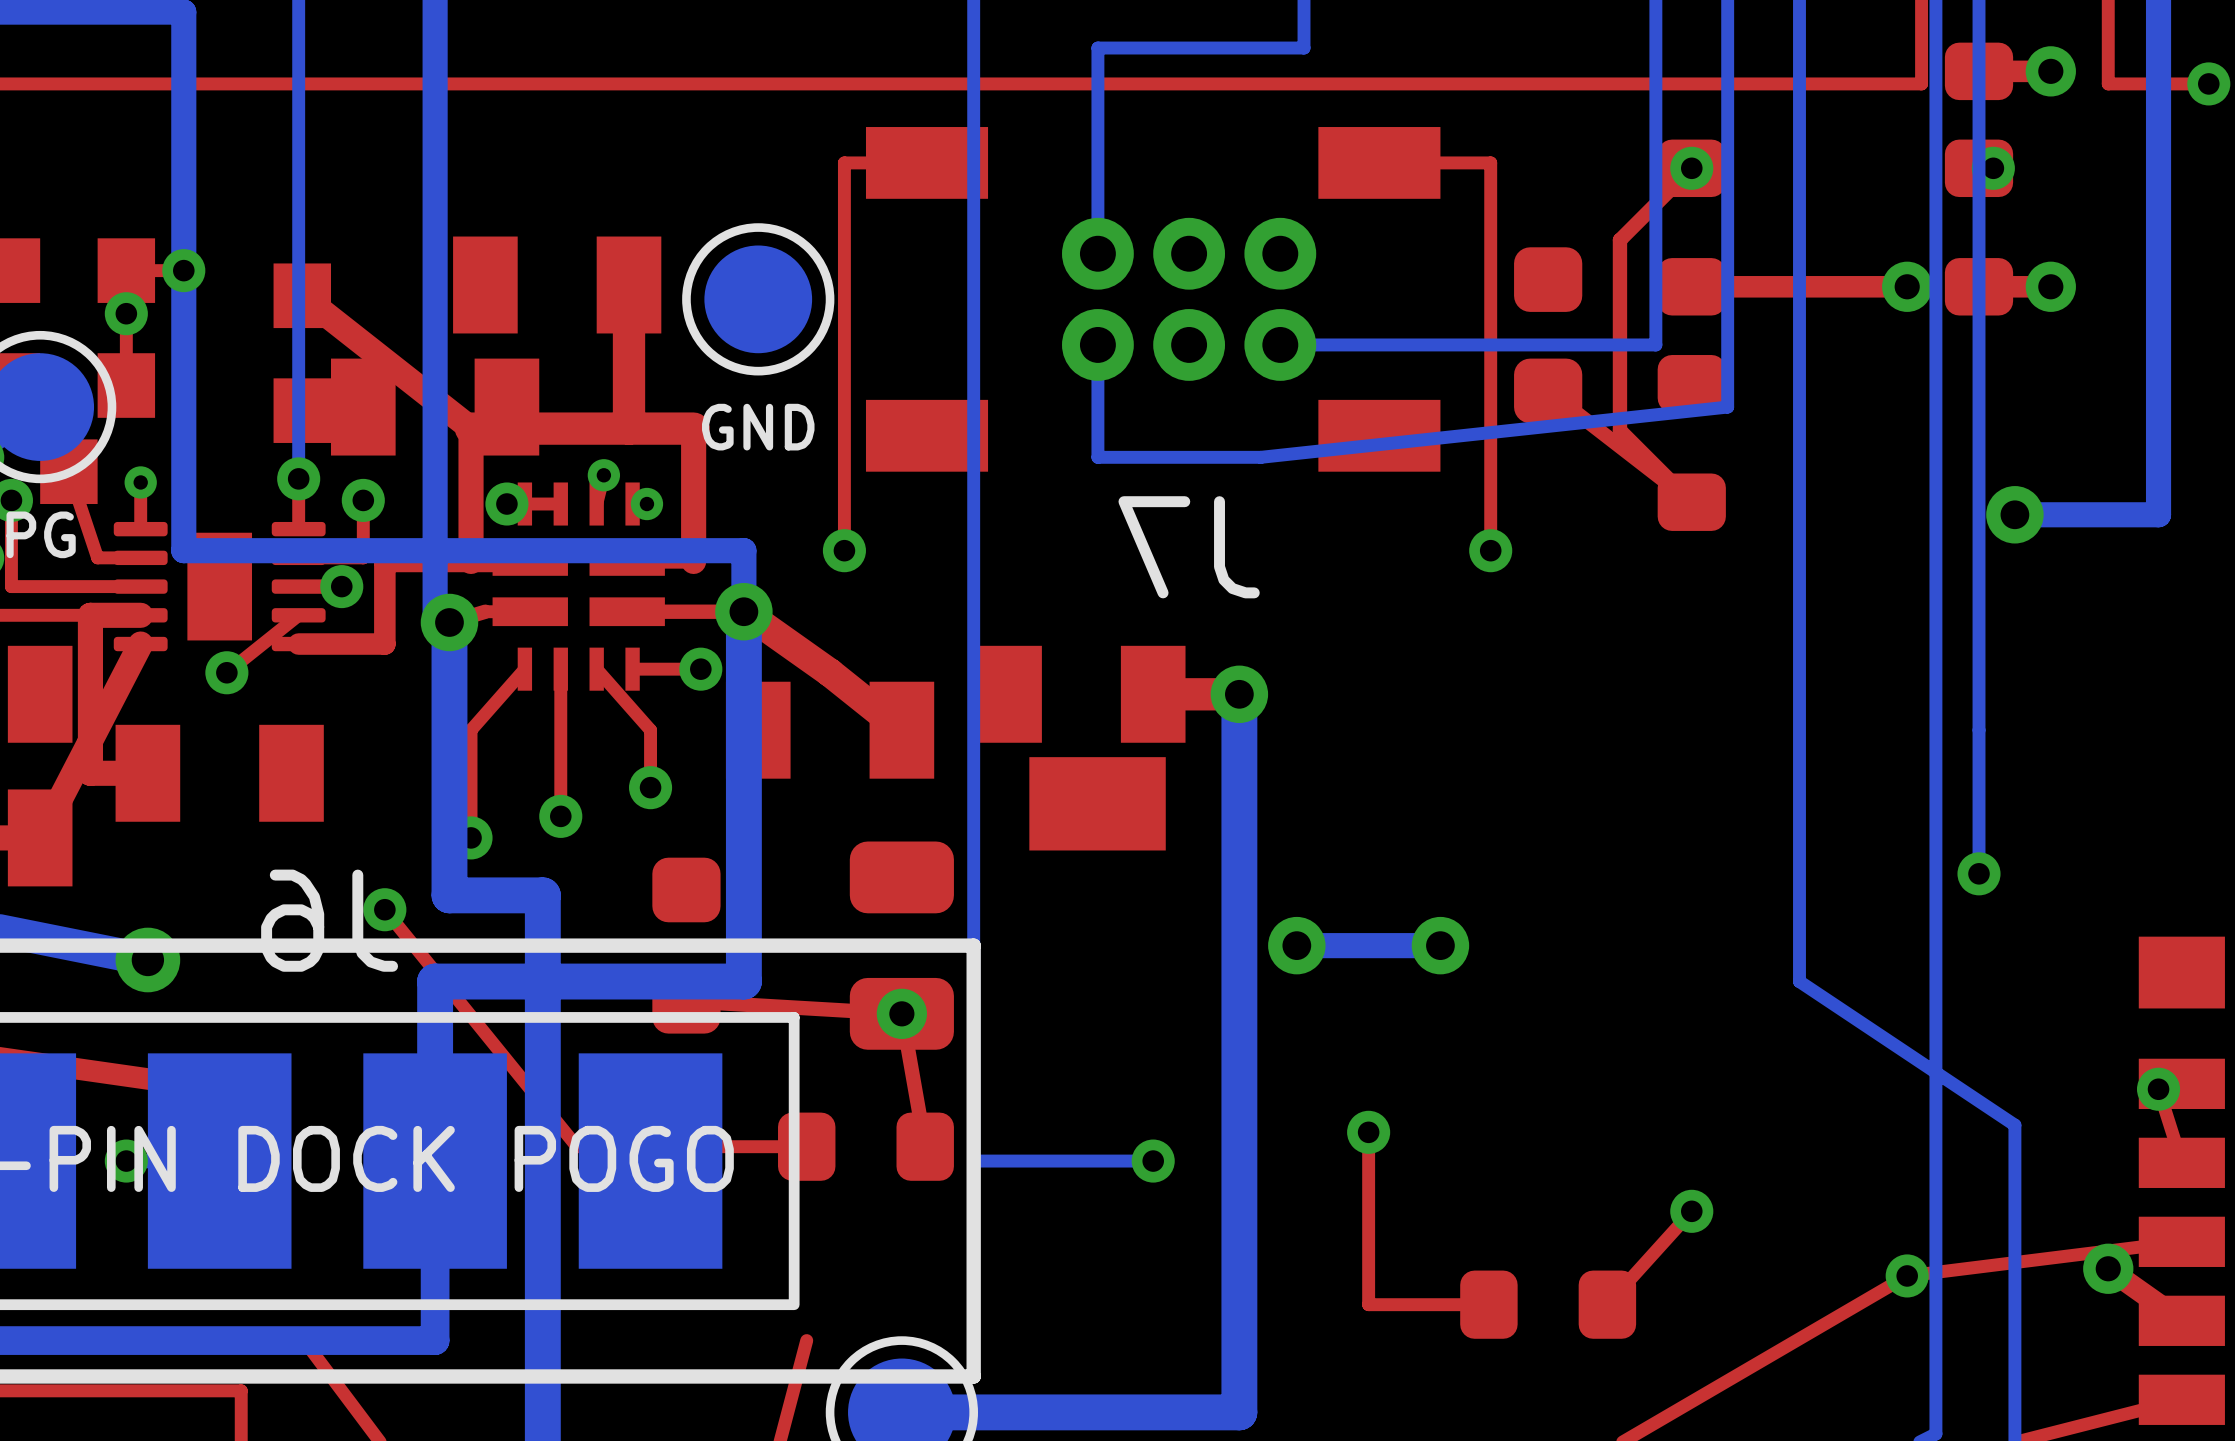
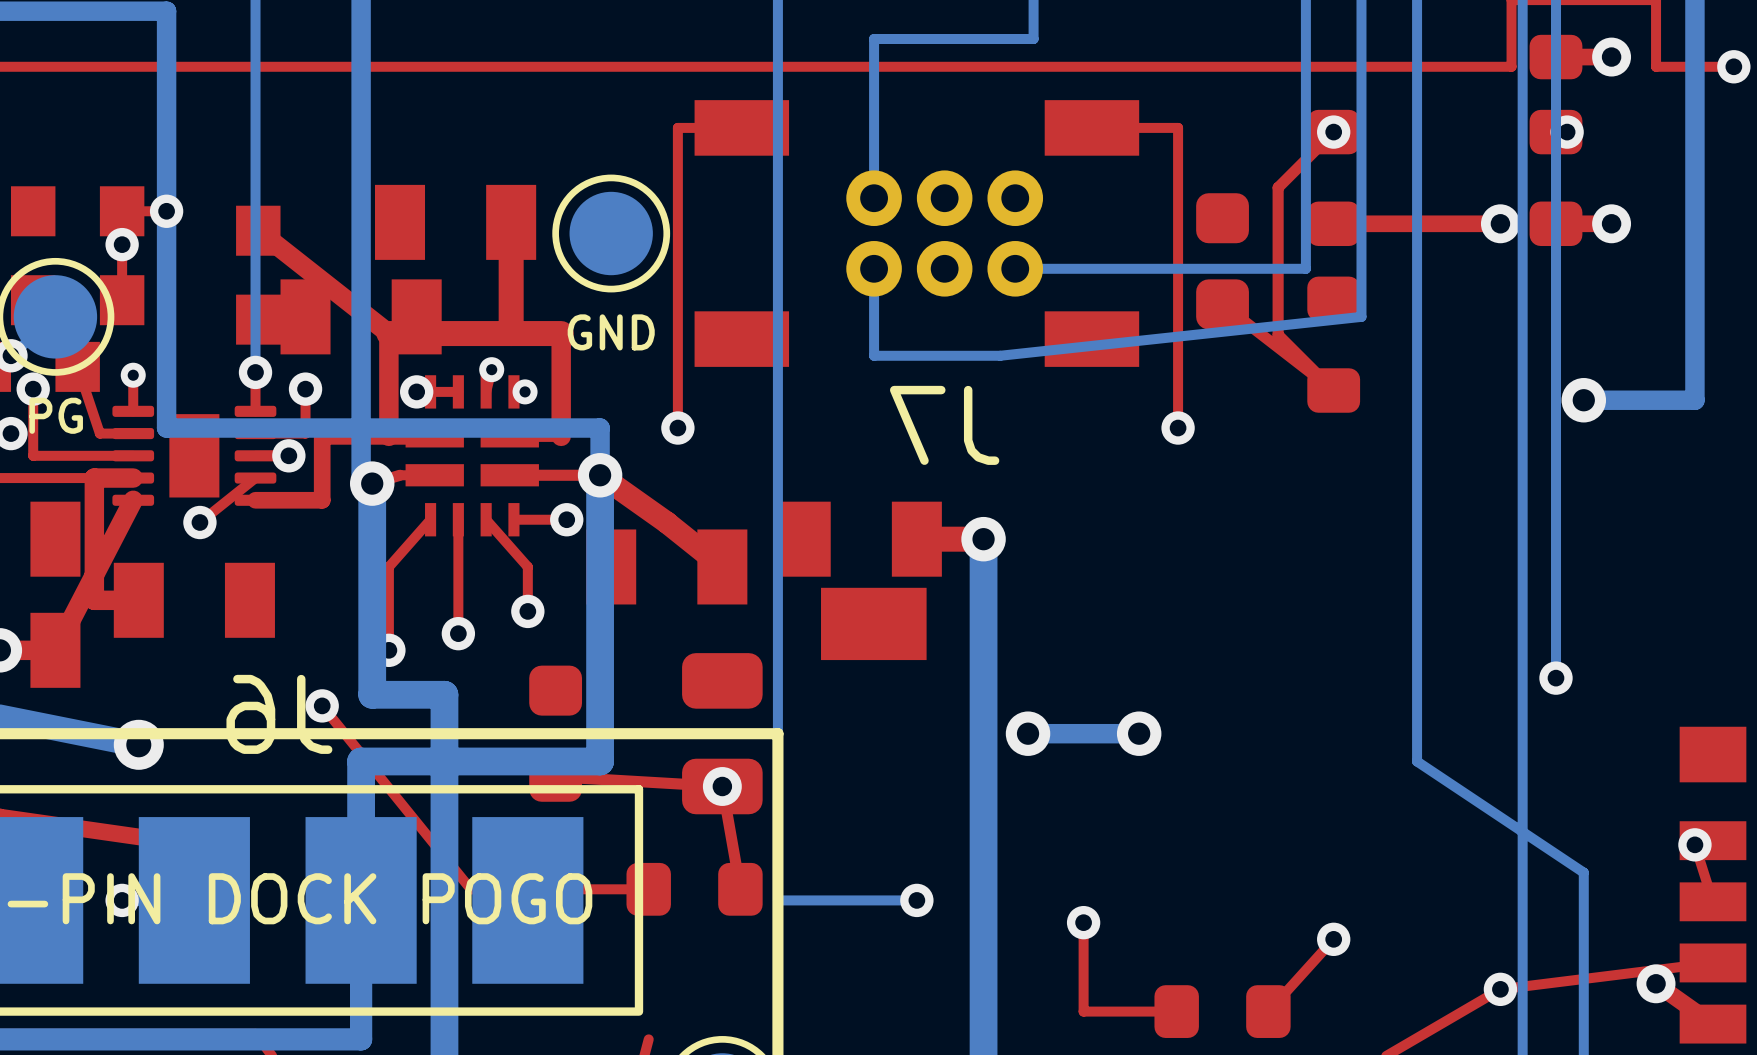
top track: (1368, 1132) (1368, 1189) -> none
via position: (1368, 1132) -> (1083, 922)

